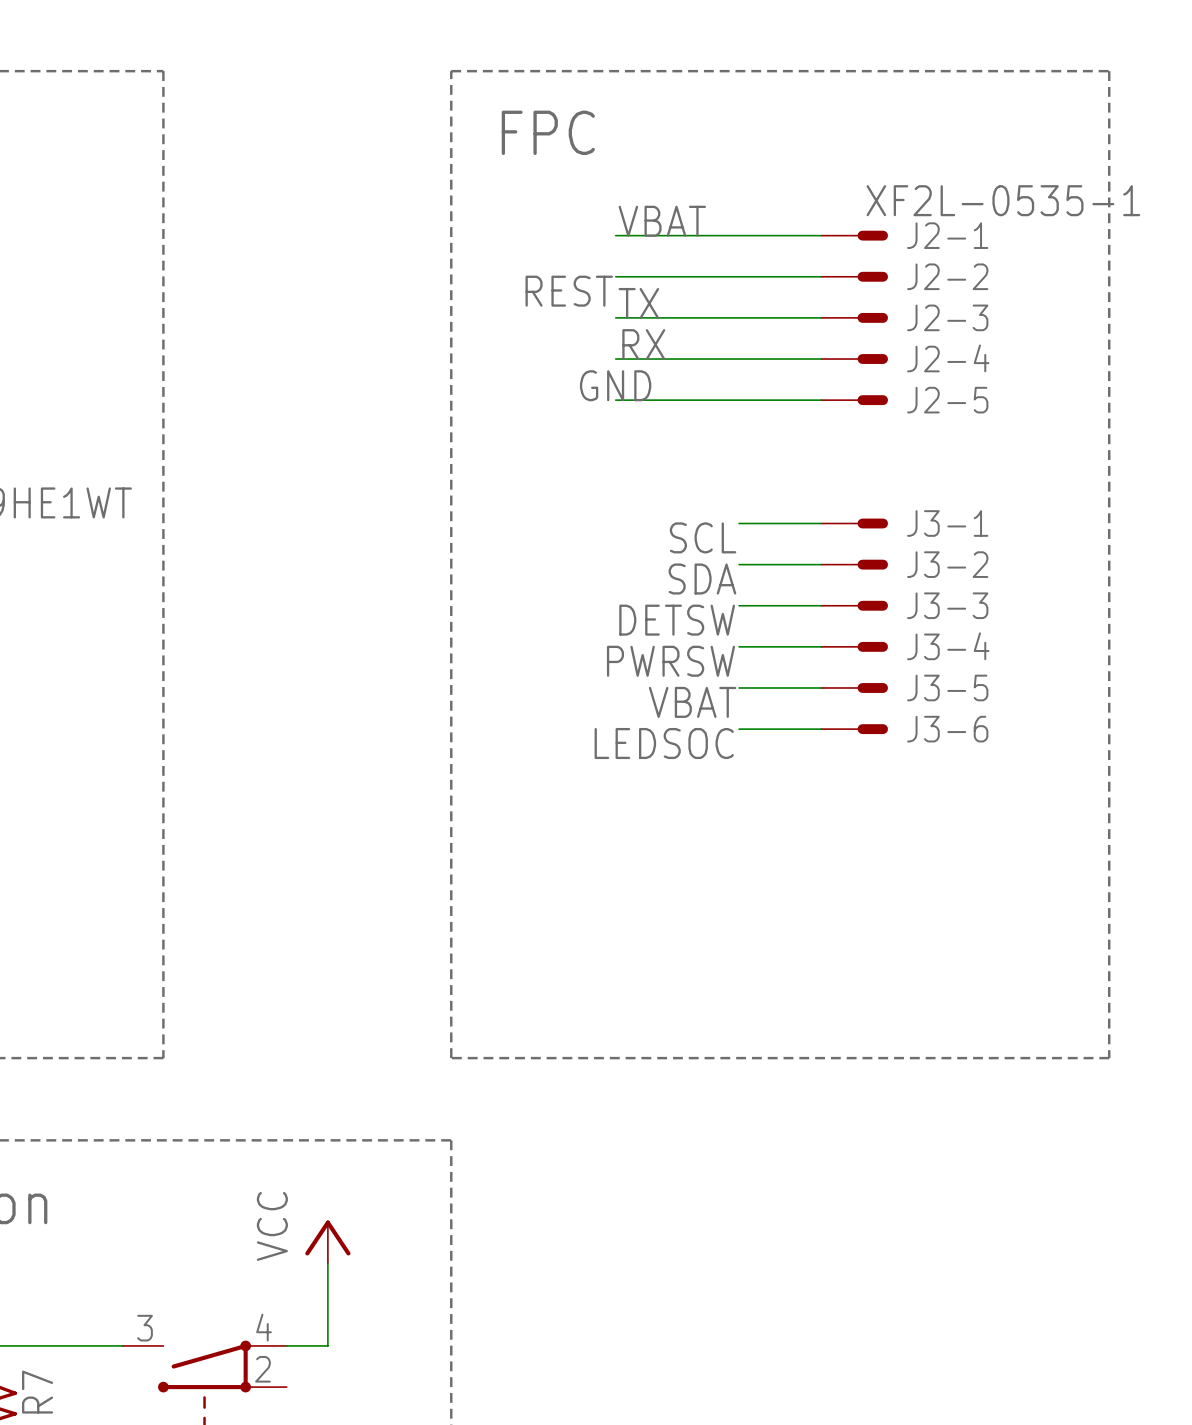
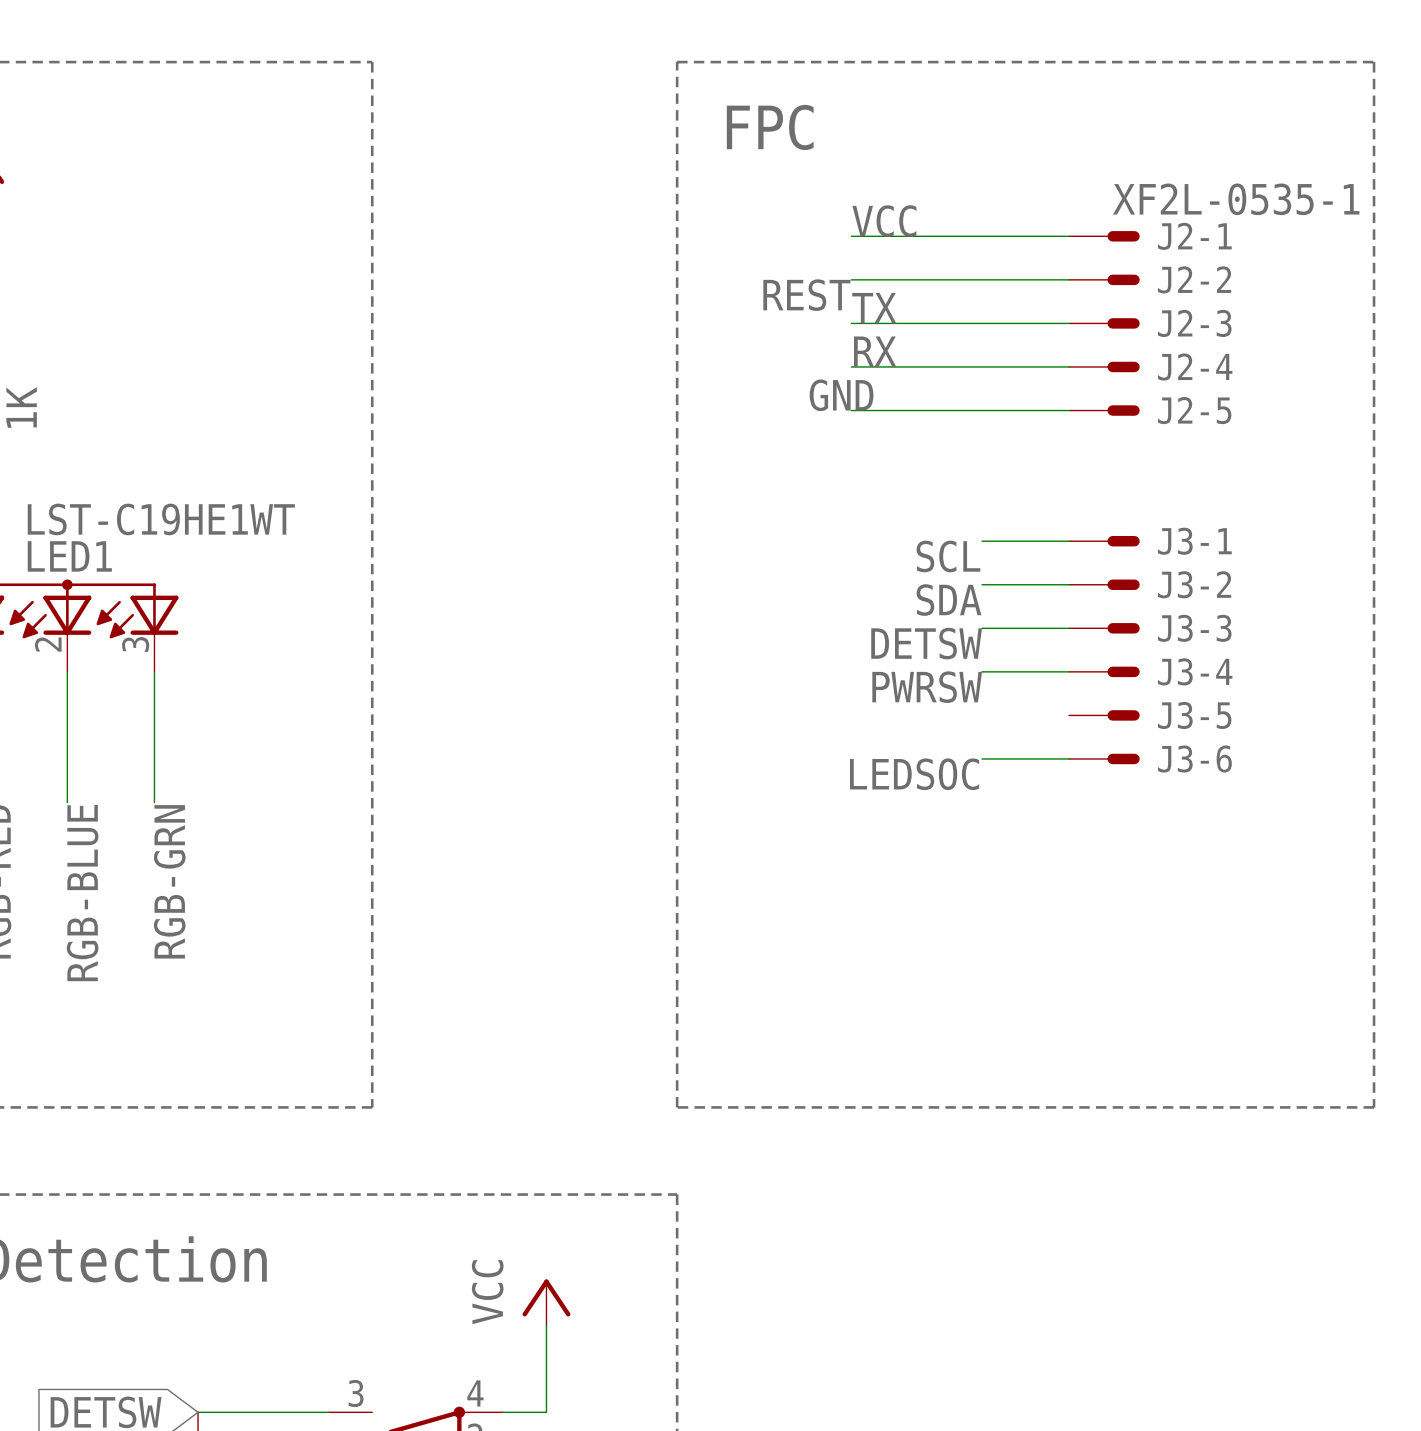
label: VBAT (662, 221) -> VCC (884, 221)
wire: (739, 687) (821, 687) -> none
label: VBAT (692, 702) -> none

